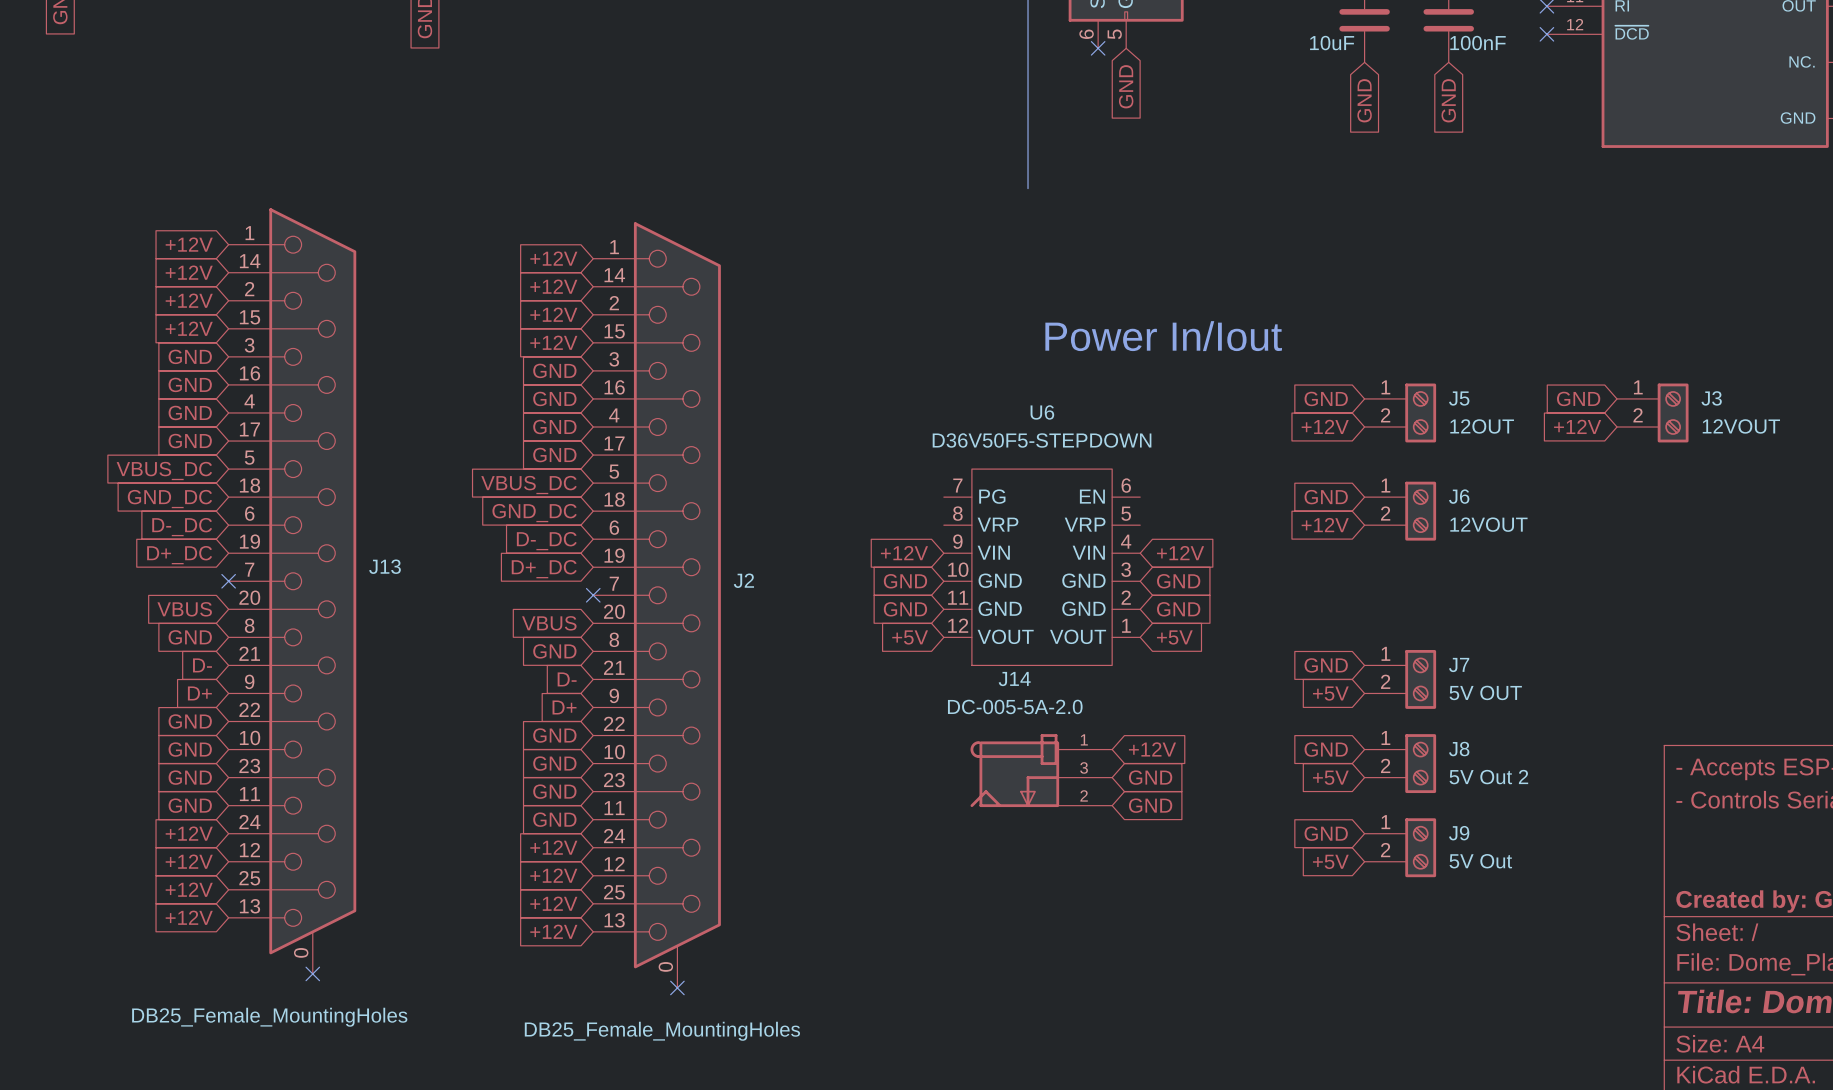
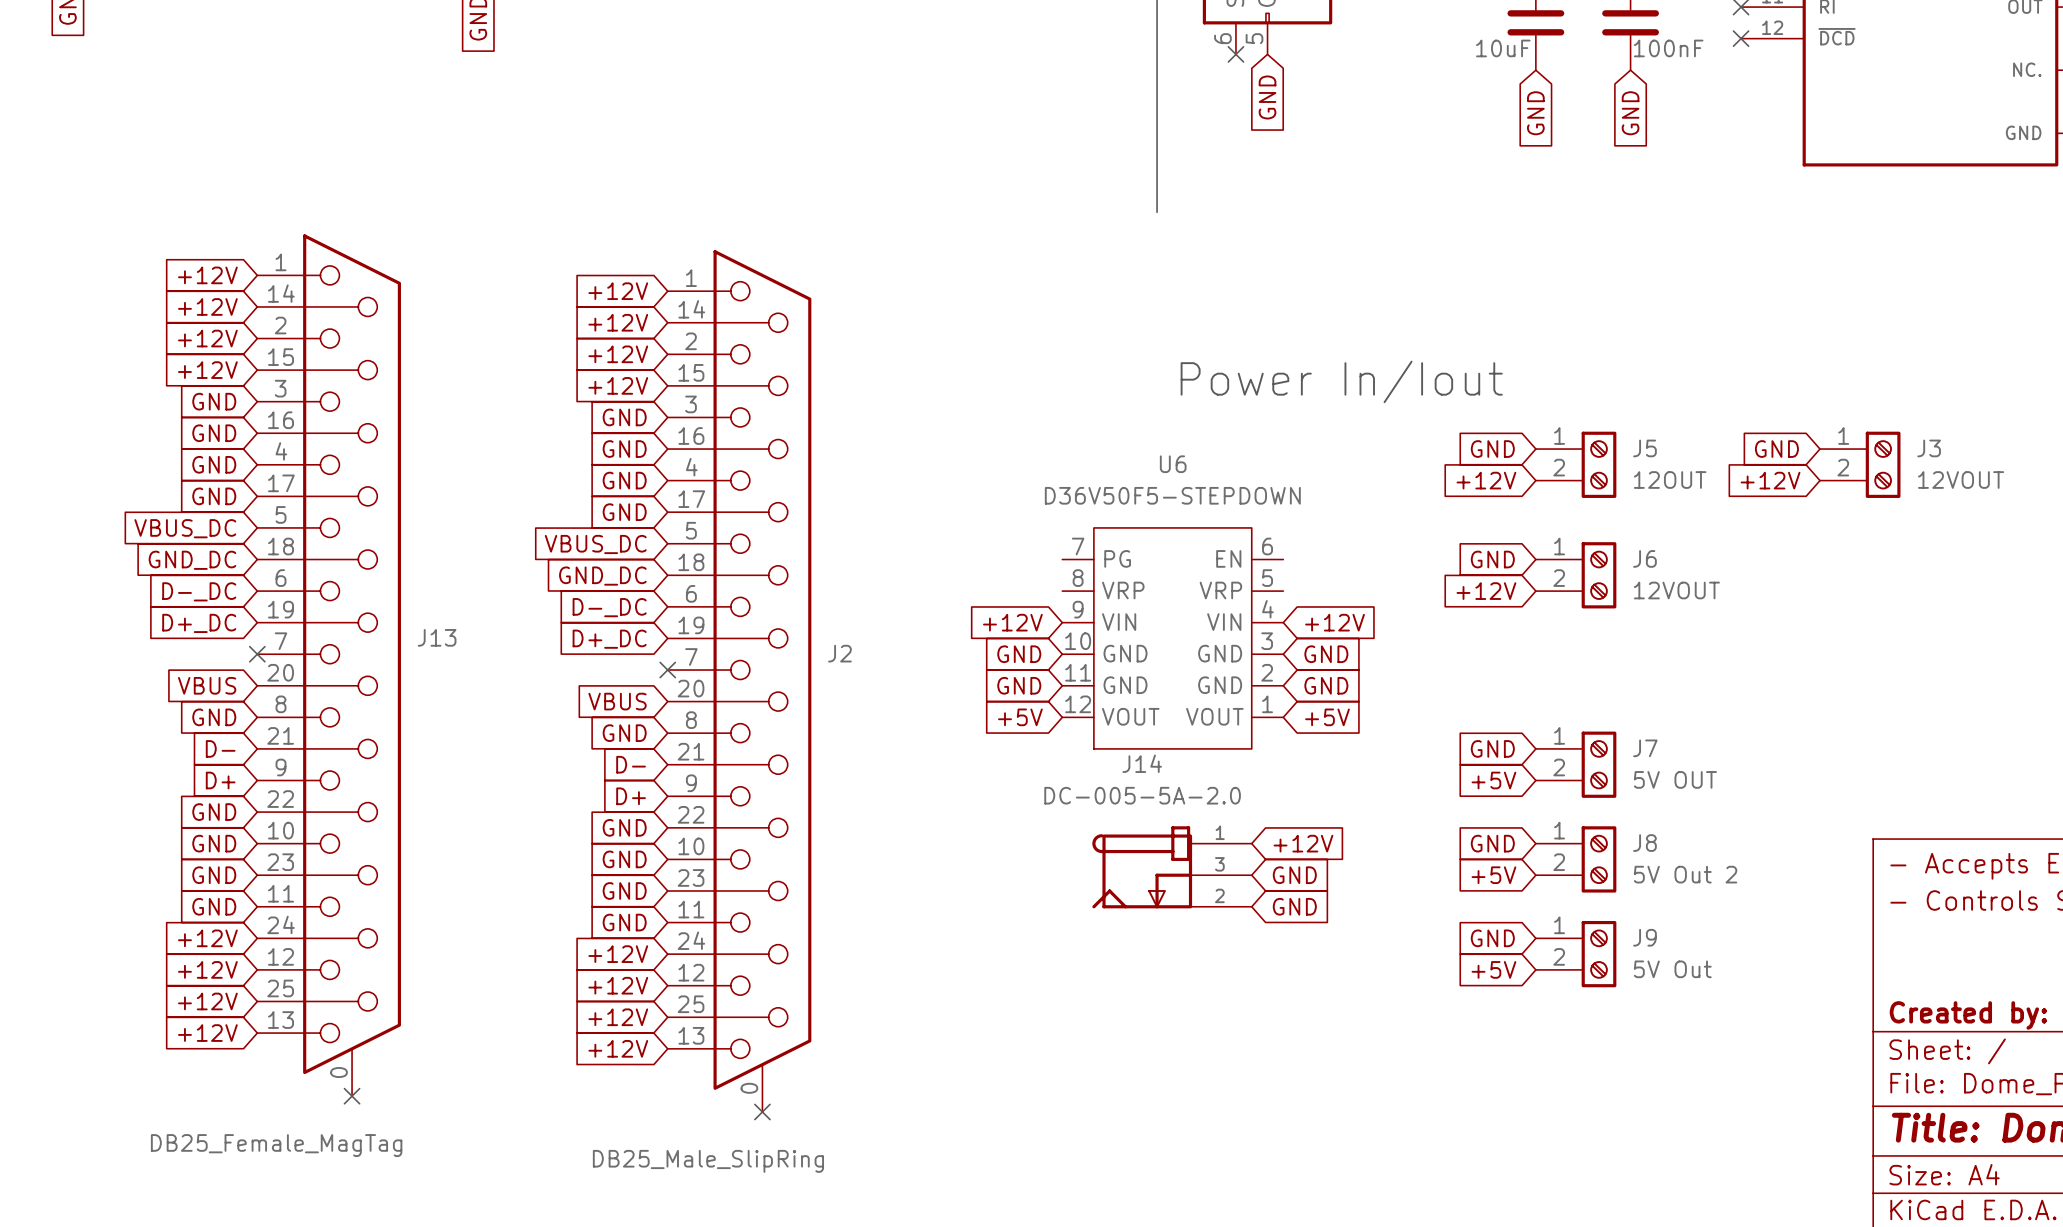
J13 value: DB25_Female_MountingHoles (269, 1017) -> DB25_Female_MagTag (276, 1145)
J2 value: DB25_Female_MountingHoles (662, 1031) -> DB25_Male_SlipRing (708, 1161)

